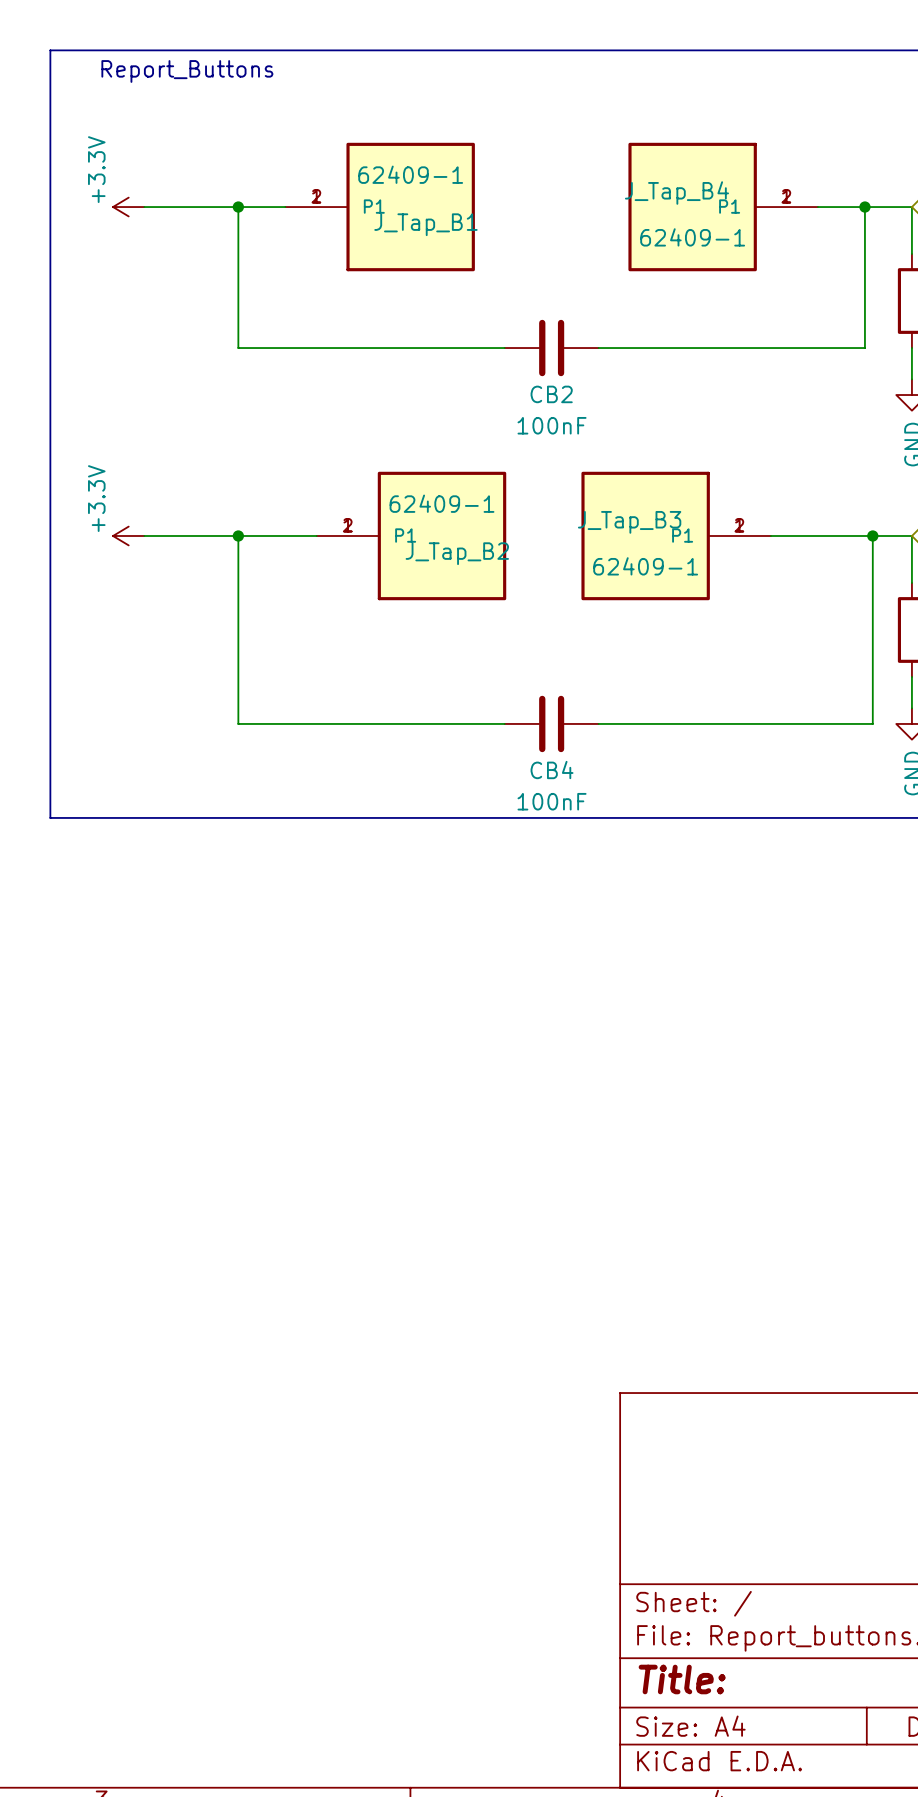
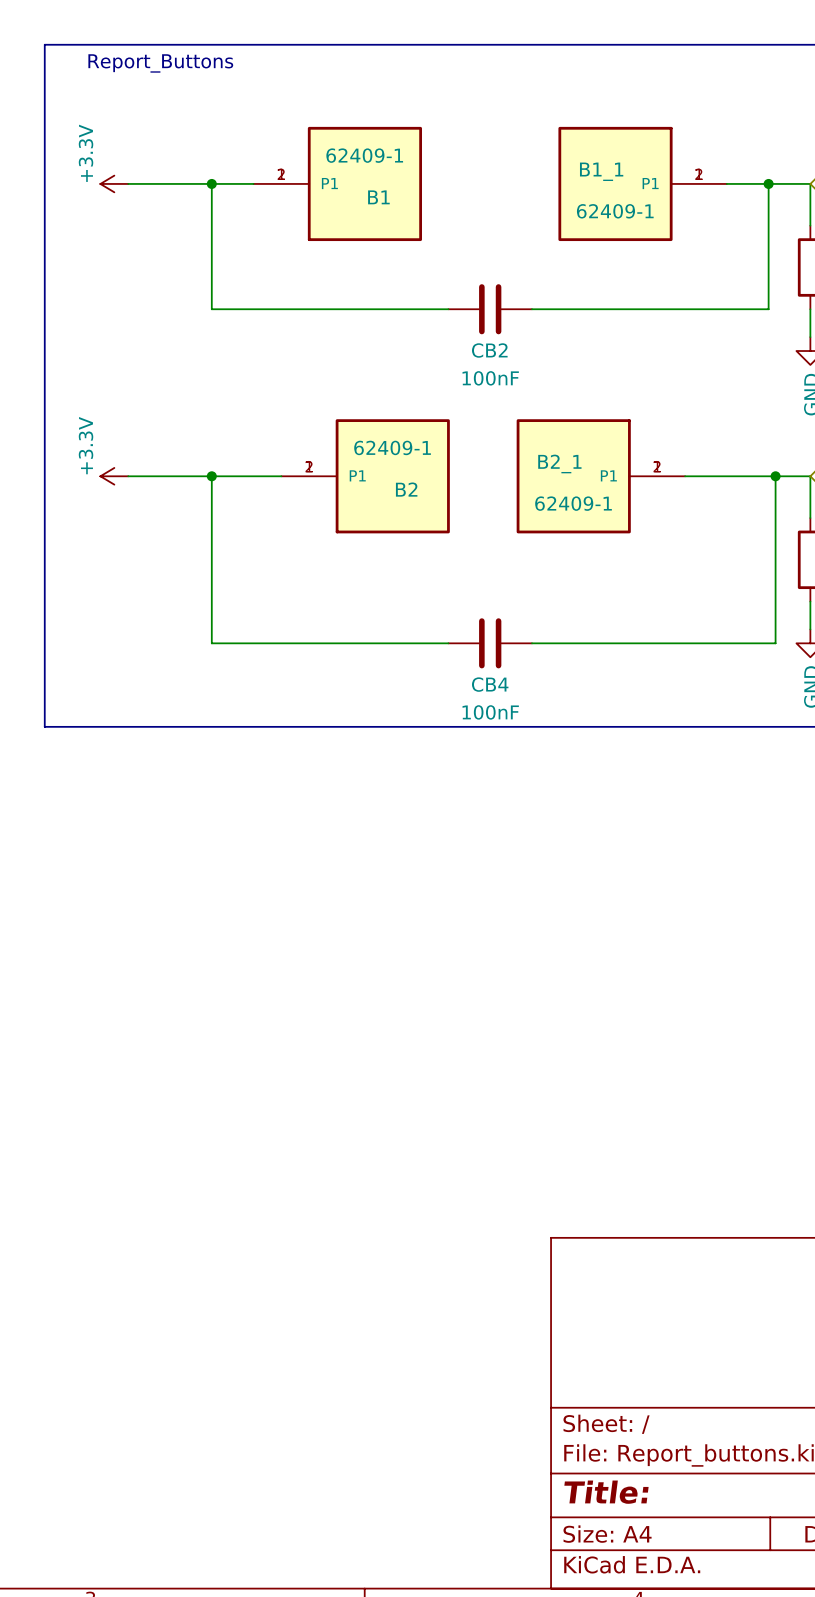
J_Tap_B4 name: J_Tap_B4 (676, 193) -> B1_1 (601, 171)
J_Tap_B1 name: J_Tap_B1 (425, 224) -> B1 (378, 197)
J_Tap_B3 name: J_Tap_B3 (629, 522) -> B2_1 (559, 463)
J_Tap_B2 name: J_Tap_B2 (457, 553) -> B2 (406, 489)

